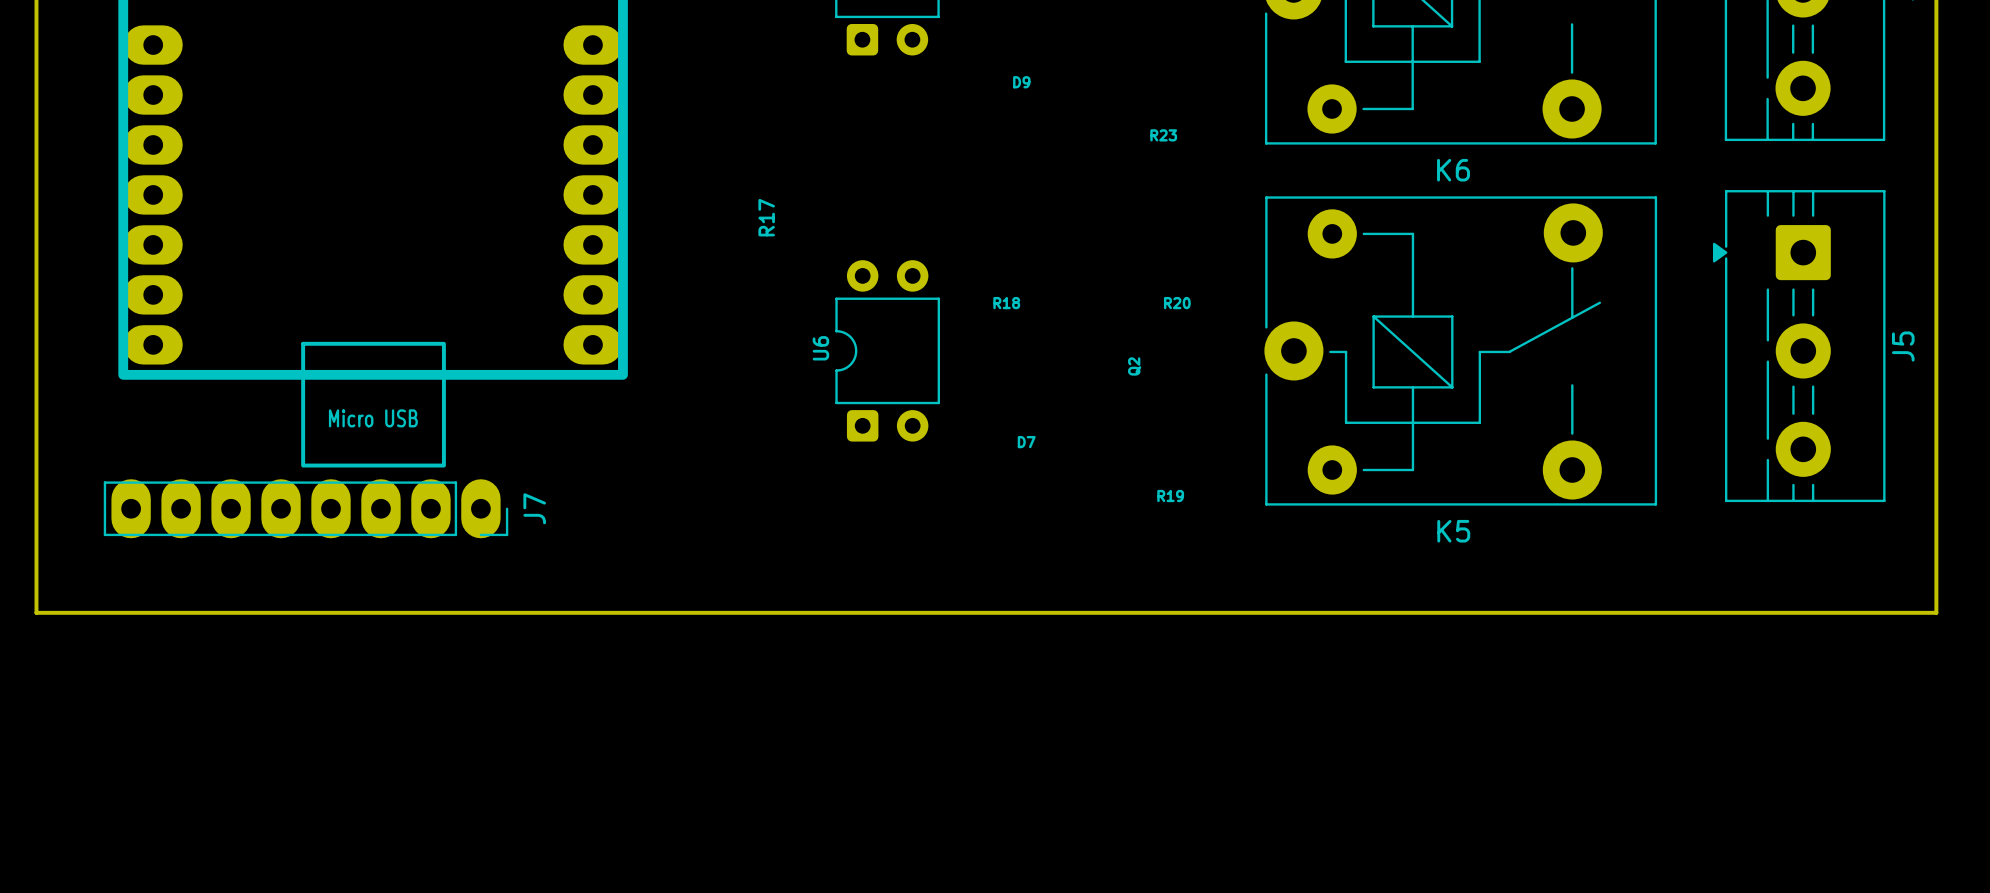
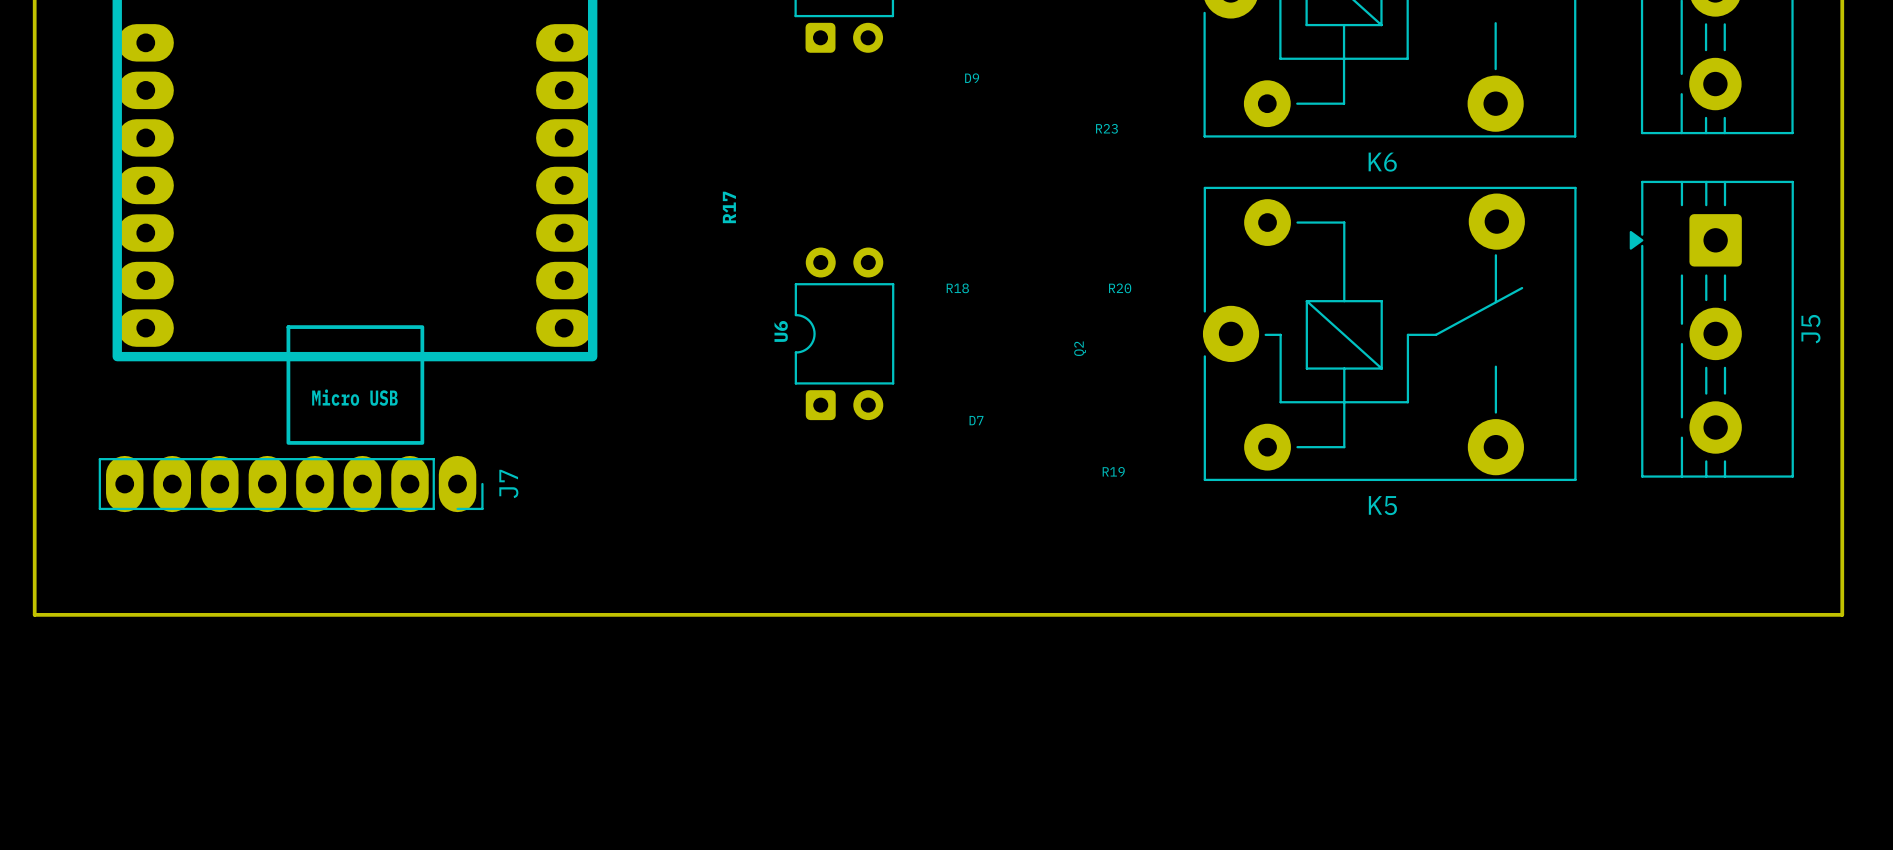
board edge: (36, 612) (1936, 612) -> (34, 583) (34, 614) (1842, 614) (1842, 583)

